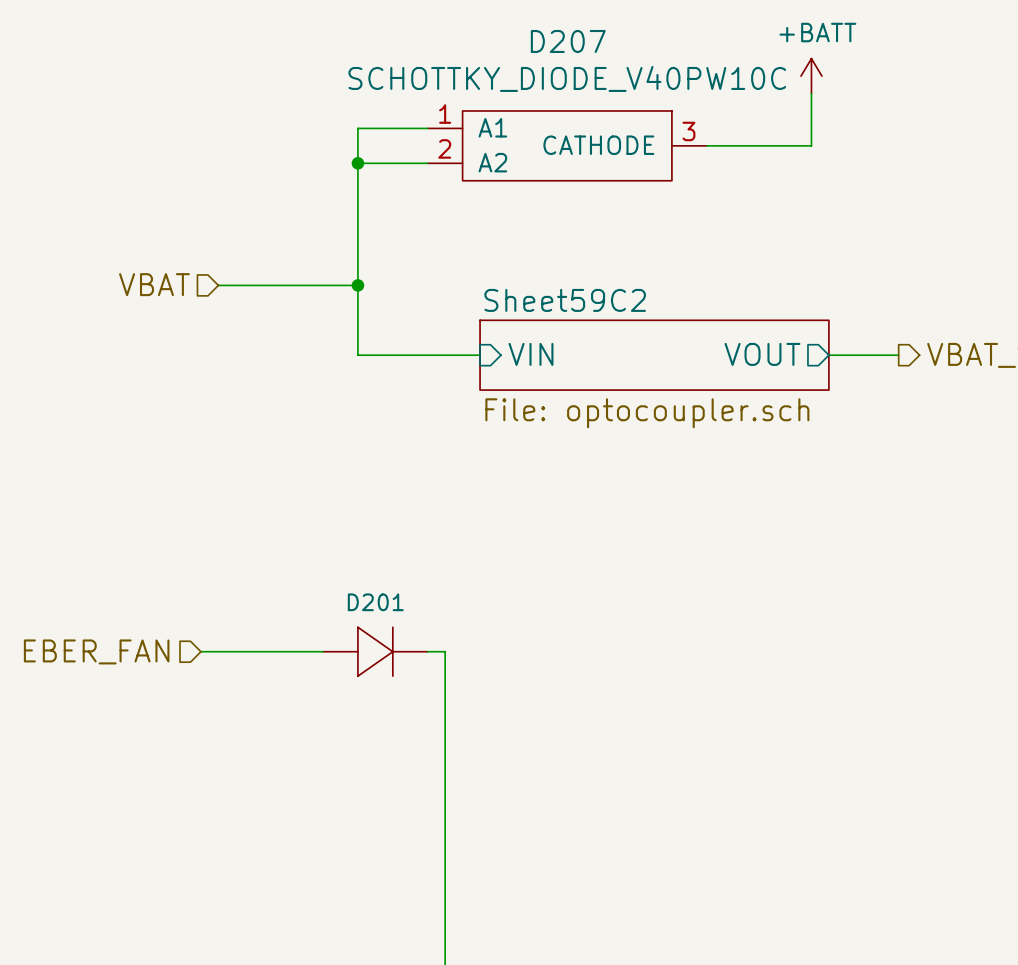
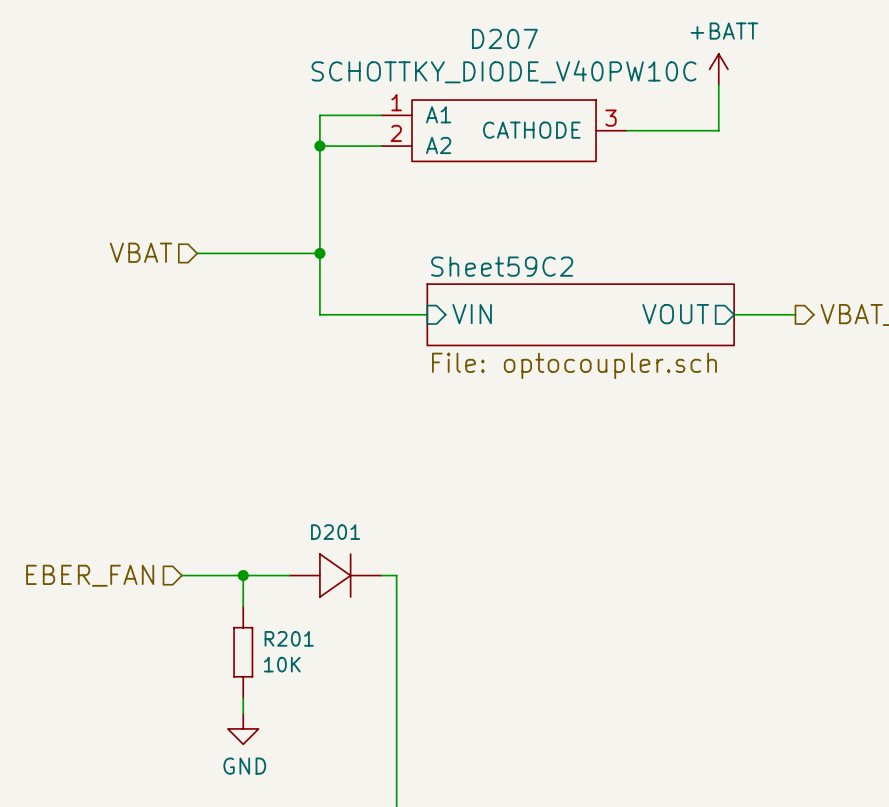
wire: none -> (243, 575) (243, 606)
junction: none -> (243, 575)
R201: none -> 10K (243, 652)
wire: none -> (243, 698) (243, 713)
power symbol: none -> GND (243, 728)

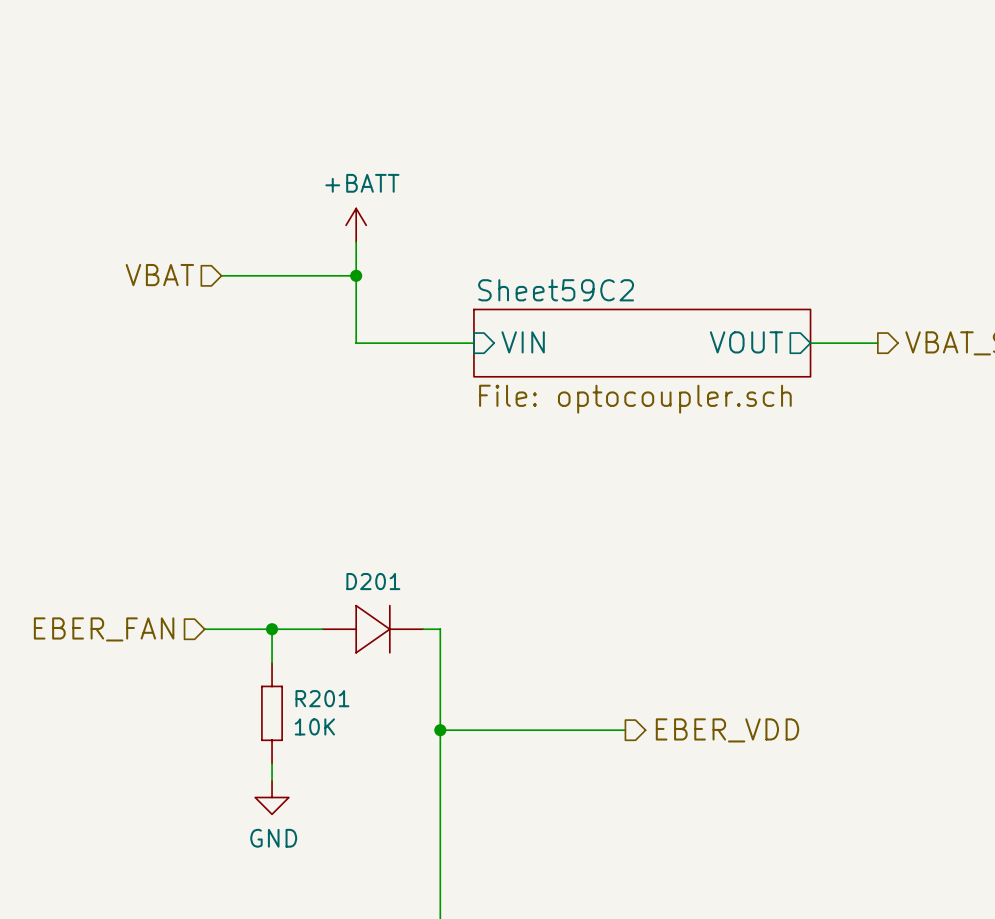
power symbol: +BATT (718, 69) -> none
wire: (718, 84) (718, 130) (626, 130) -> none
wire: (381, 115) (319, 115) (319, 222) -> none
D207: SCHOTTKY_DIODE_V40PW10C (504, 130) -> none
wire: (319, 146) (381, 146) -> none
junction: (319, 146) -> none
power symbol: none -> +BATT (356, 225)
wire: none -> (440, 730) (625, 730)
junction: none -> (440, 730)
hierarchical label: none -> EBER_VDD (727, 730)

